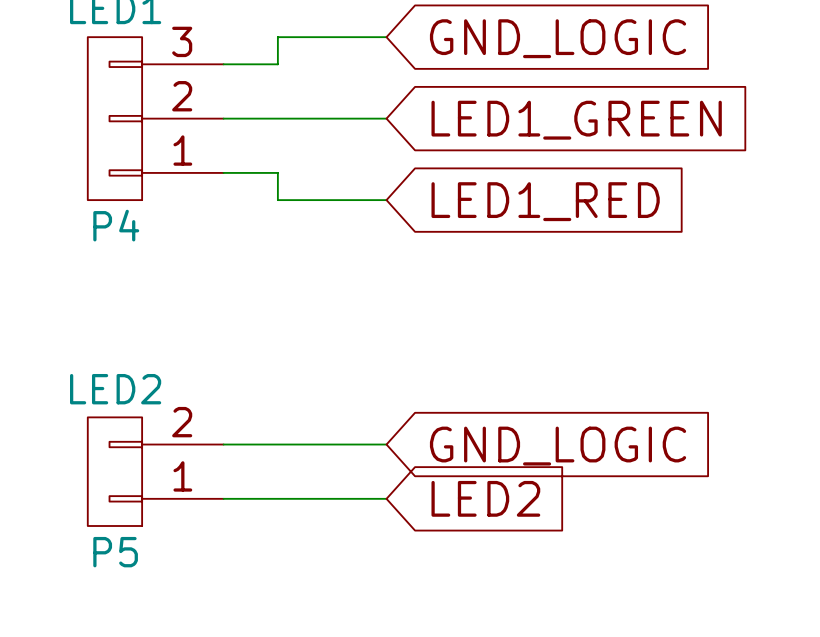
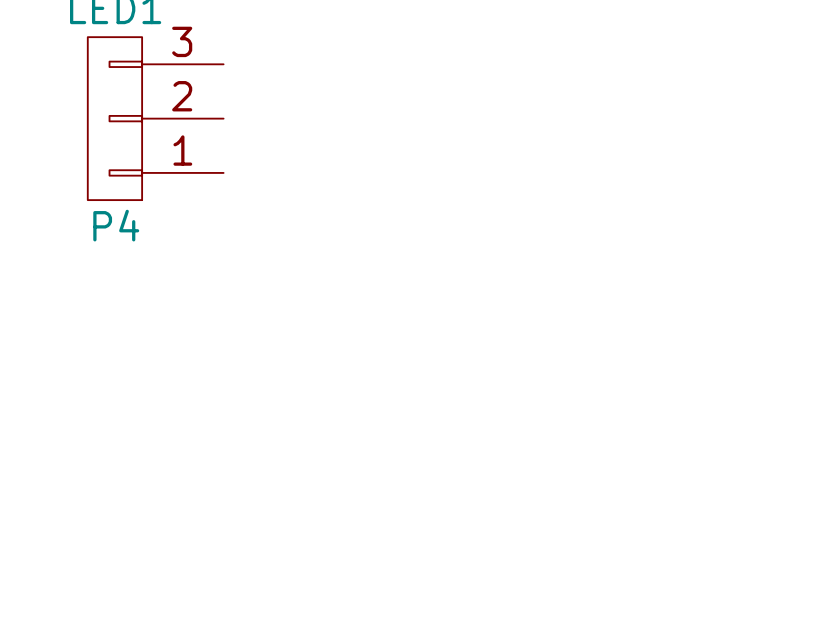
wire: (386, 37) (277, 37) (277, 64) (223, 64) -> none
global label: GND_LOGIC (558, 38) -> none
wire: (223, 118) (386, 118) -> none
global label: LED1_GREEN (576, 120) -> none
wire: (223, 172) (277, 172) (277, 200) (386, 200) -> none
global label: LED1_RED (545, 201) -> none
wire: (223, 444) (386, 444) -> none
global label: GND_LOGIC (558, 446) -> none
P5: LED2 (155, 471) -> none
wire: (223, 498) (386, 498) -> none
global label: LED2 (485, 498) -> none

